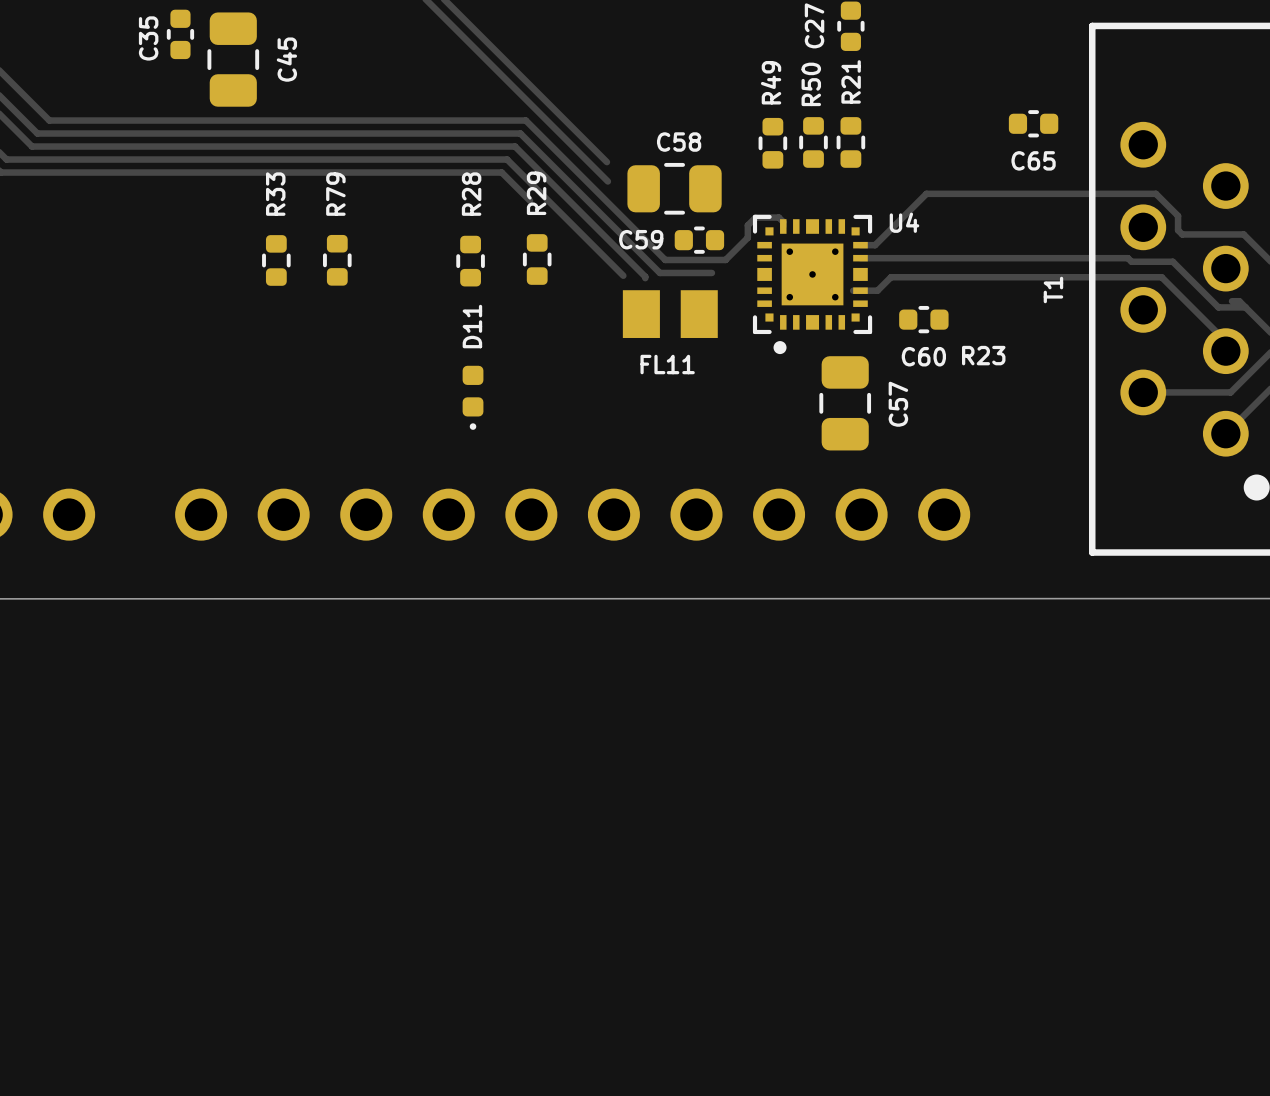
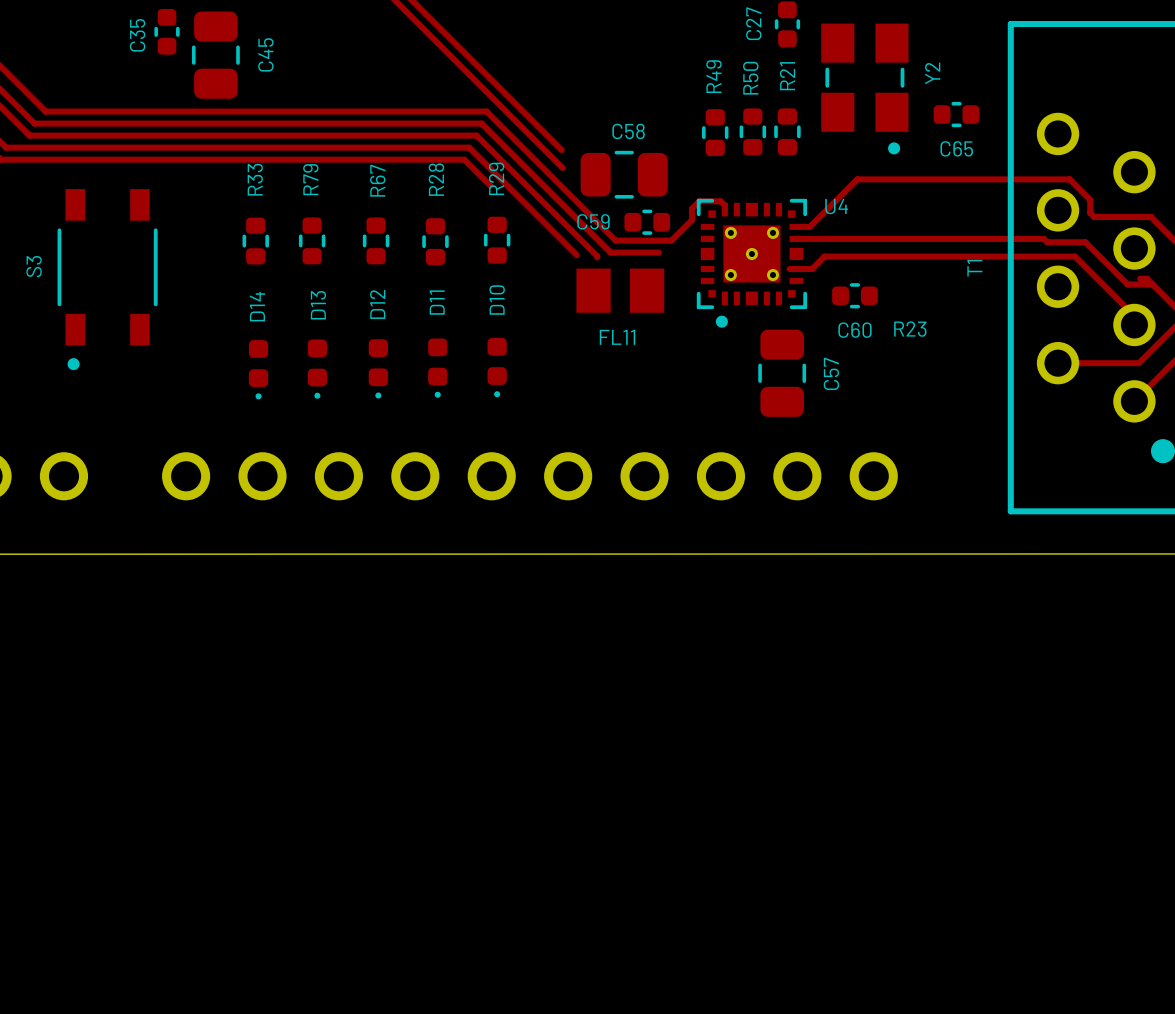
Y2: none -> (864, 88)
R67: none -> (376, 240)
S3: none -> (107, 279)
D10: none -> (497, 367)
D13: none -> (317, 369)
D12: none -> (378, 368)
D14: none -> (258, 369)

